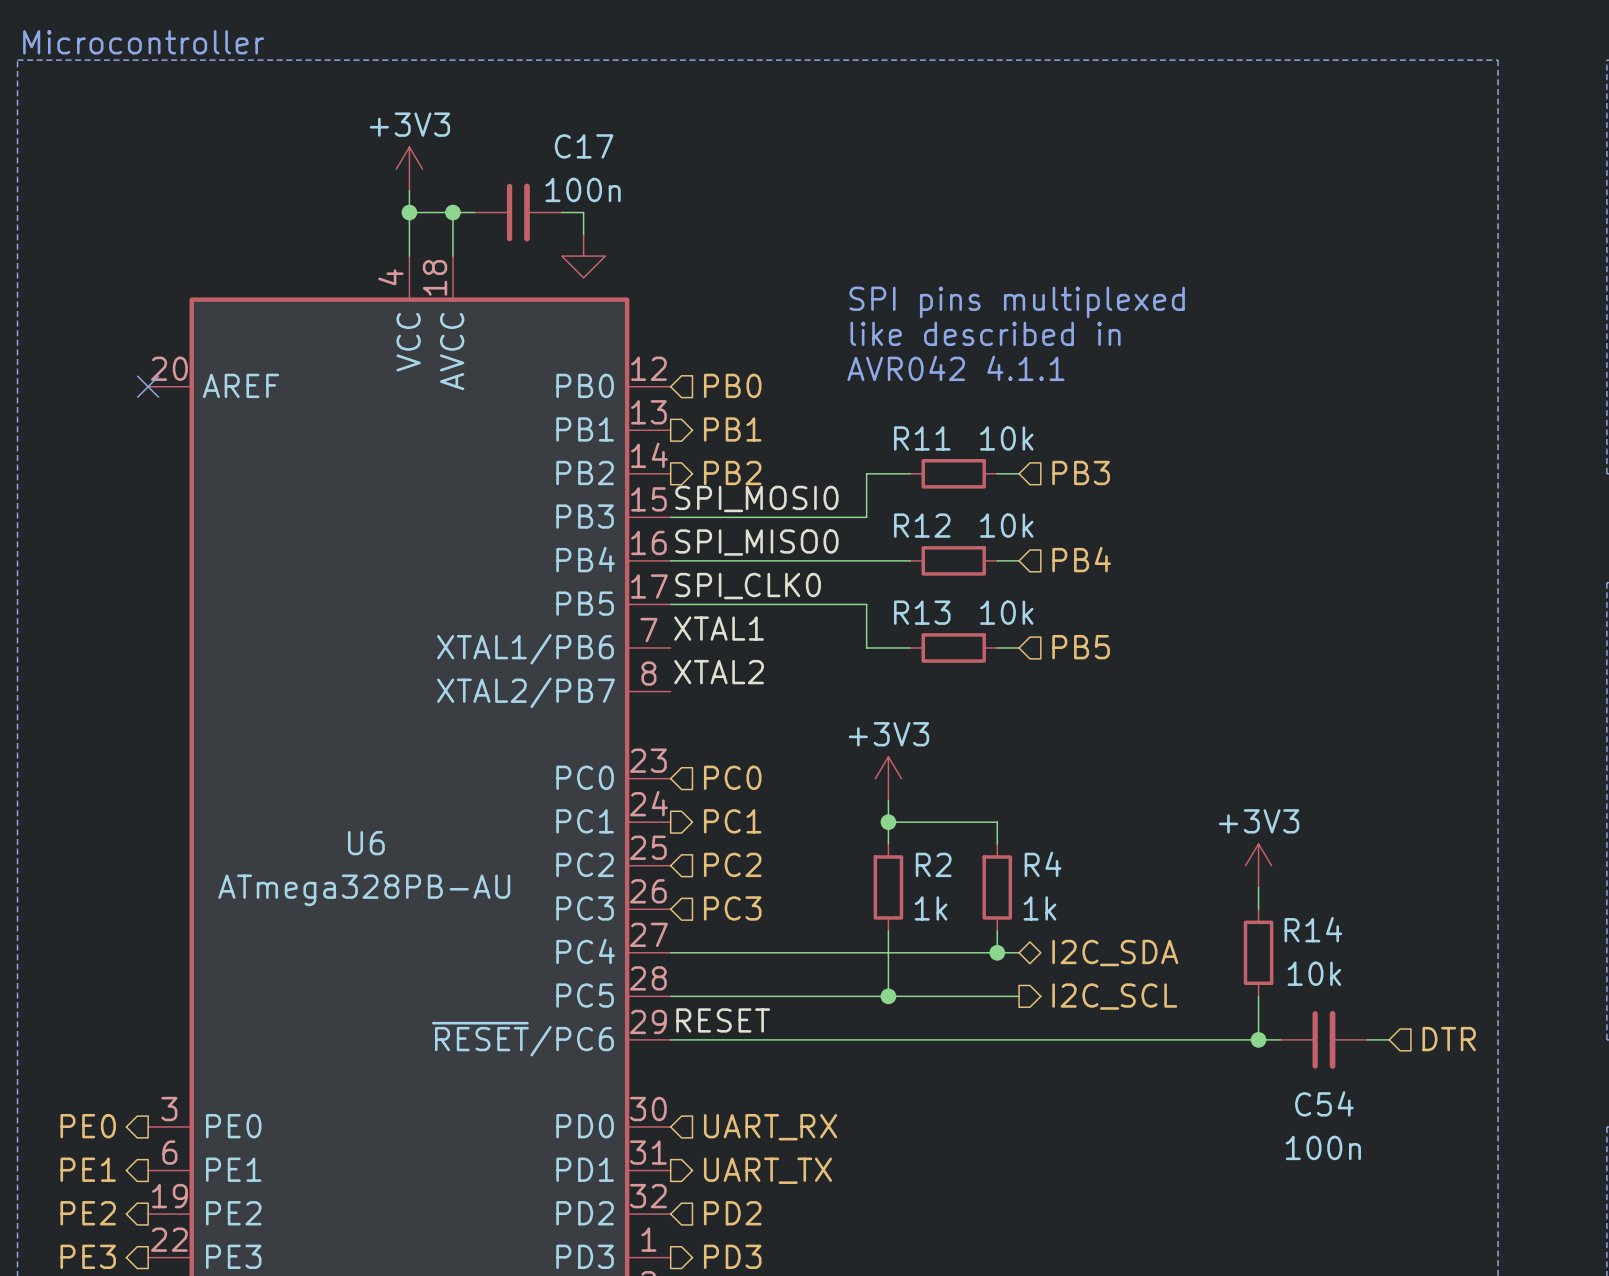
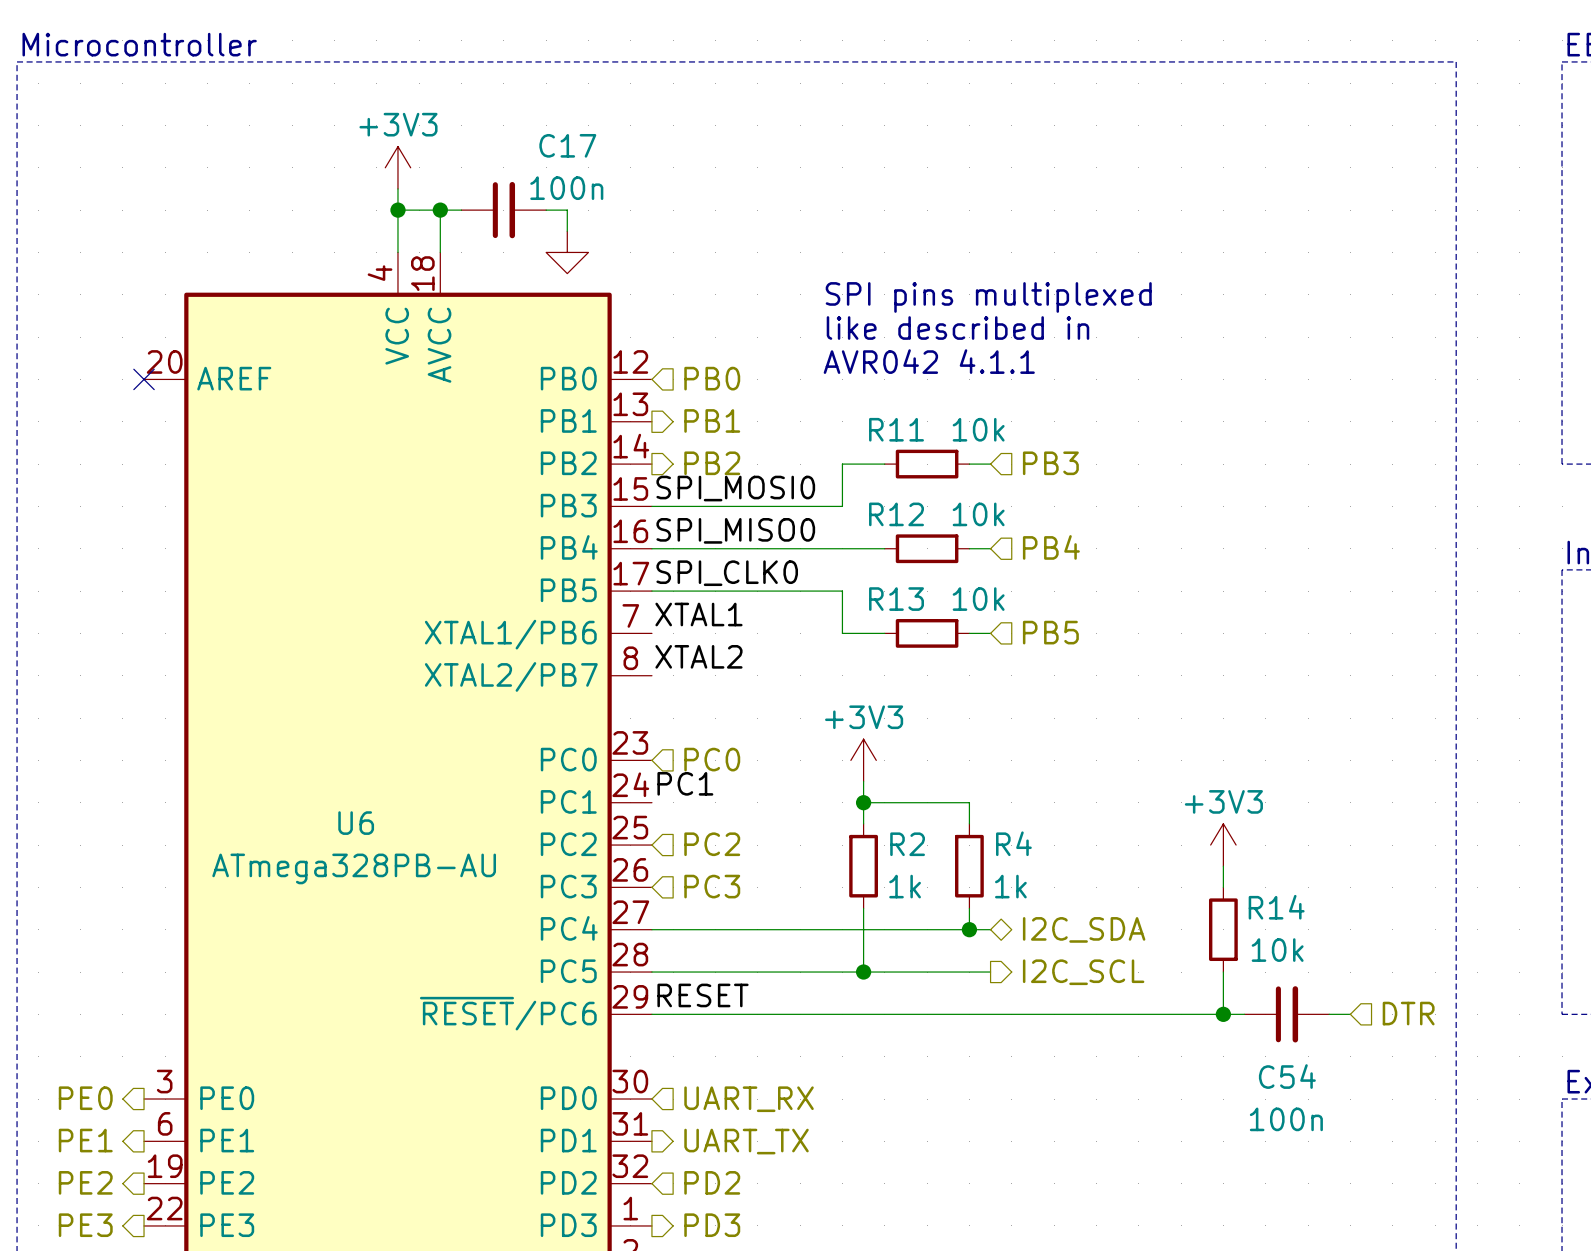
label: none -> PC1 (685, 783)
hierarchical label: PC1 (732, 821) -> none

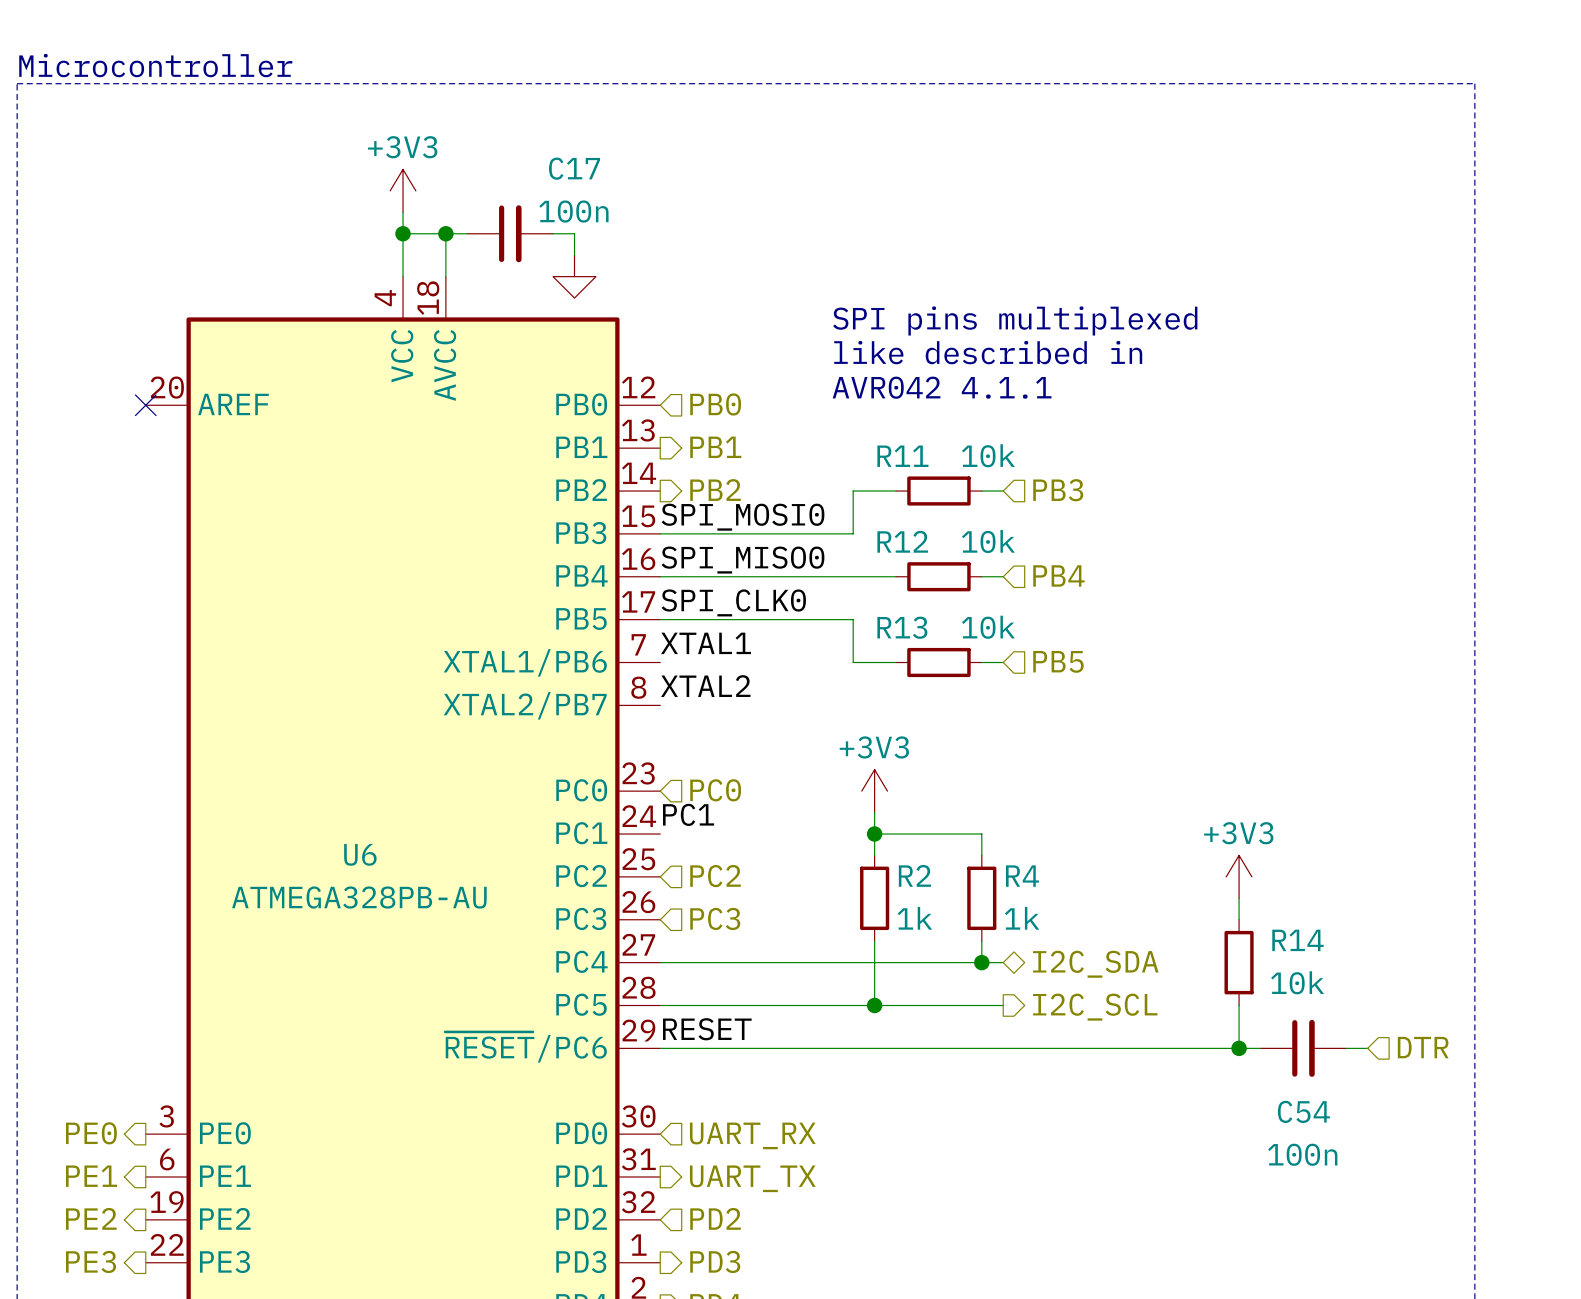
U6 value: ATmega328PB-AU (354, 868) -> ATMEGA328PB-AU (359, 897)

